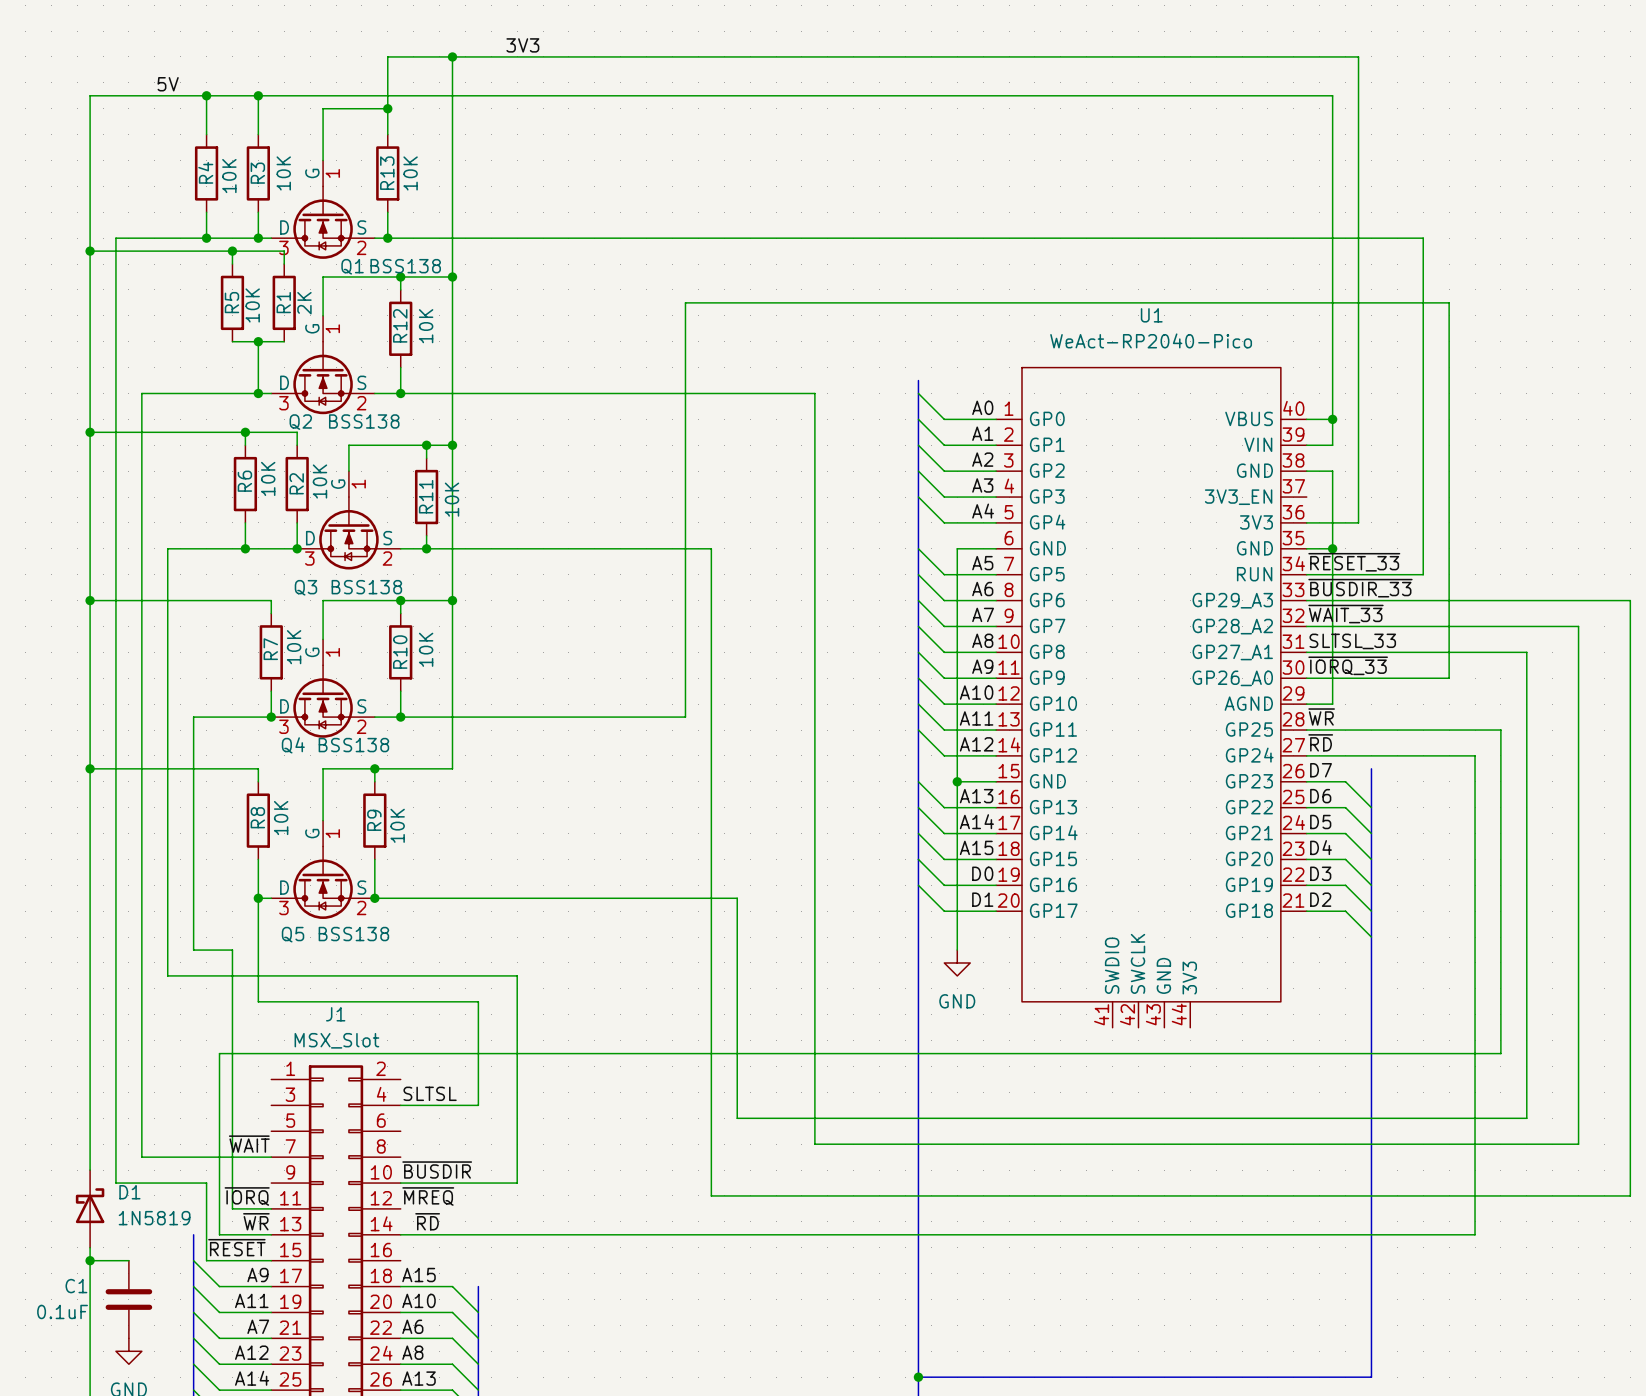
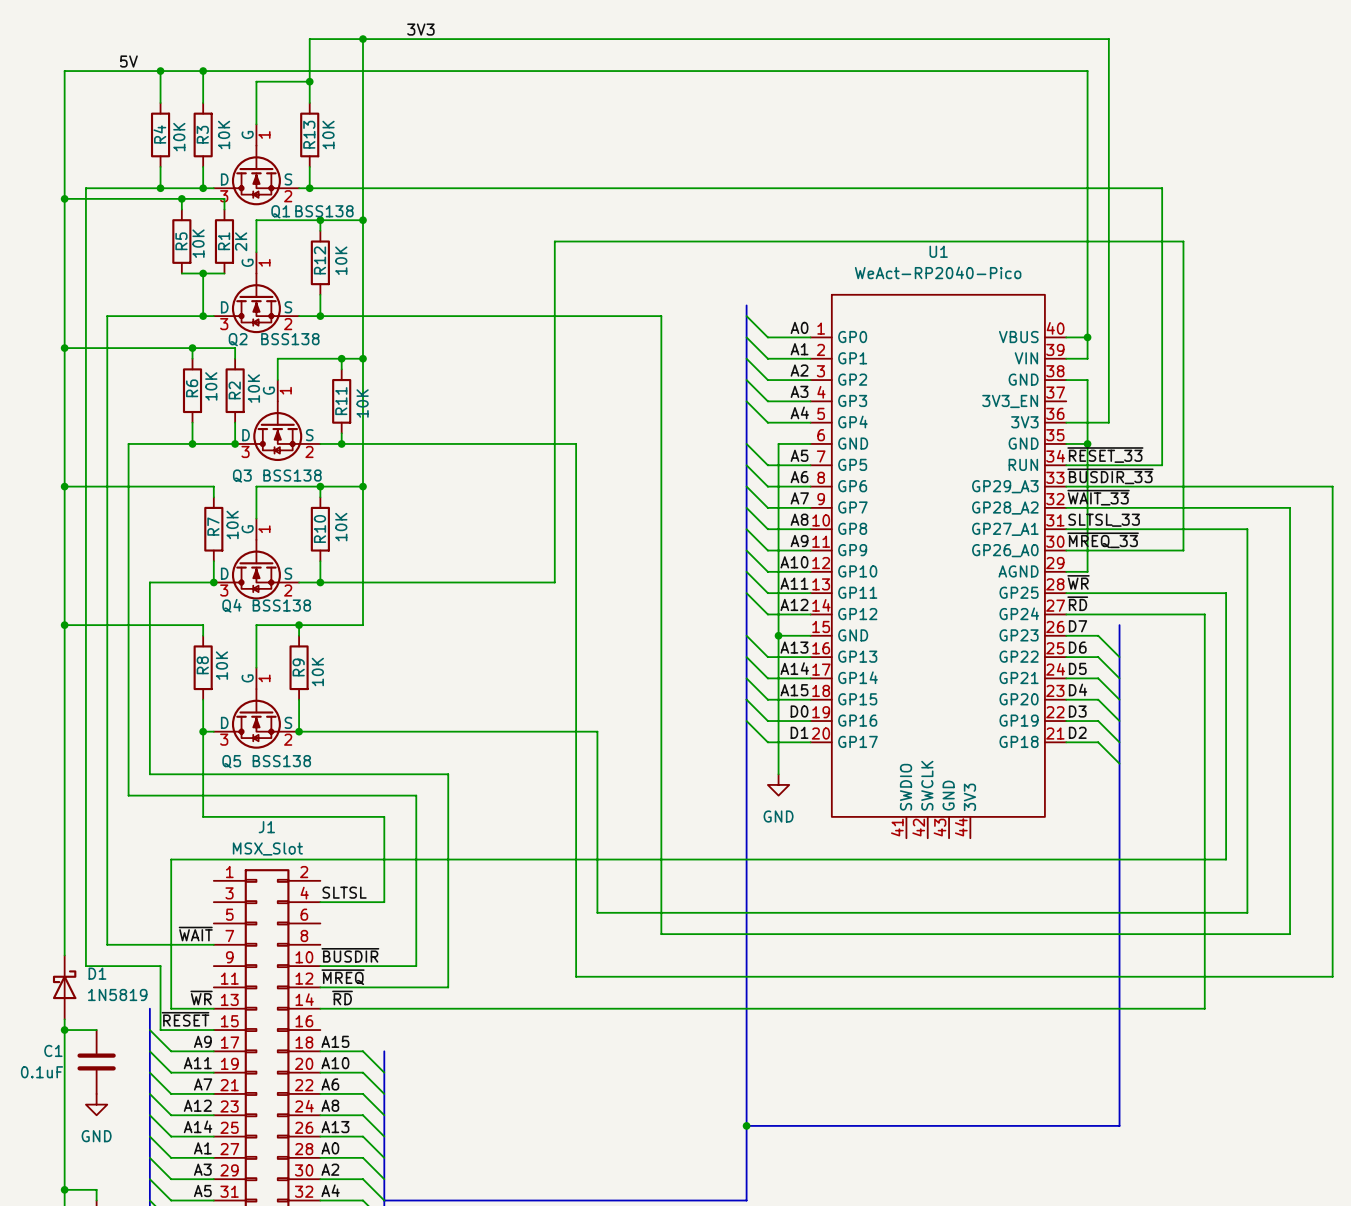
label: ~{IORQ_33} (1348, 665) -> ~{MREQ_33} (1103, 540)
wire: (232, 950) (232, 1208) (271, 1208) -> (181, 774) (448, 774) (448, 987) (320, 987)
label: ~{IORQ} (247, 1196) -> none

